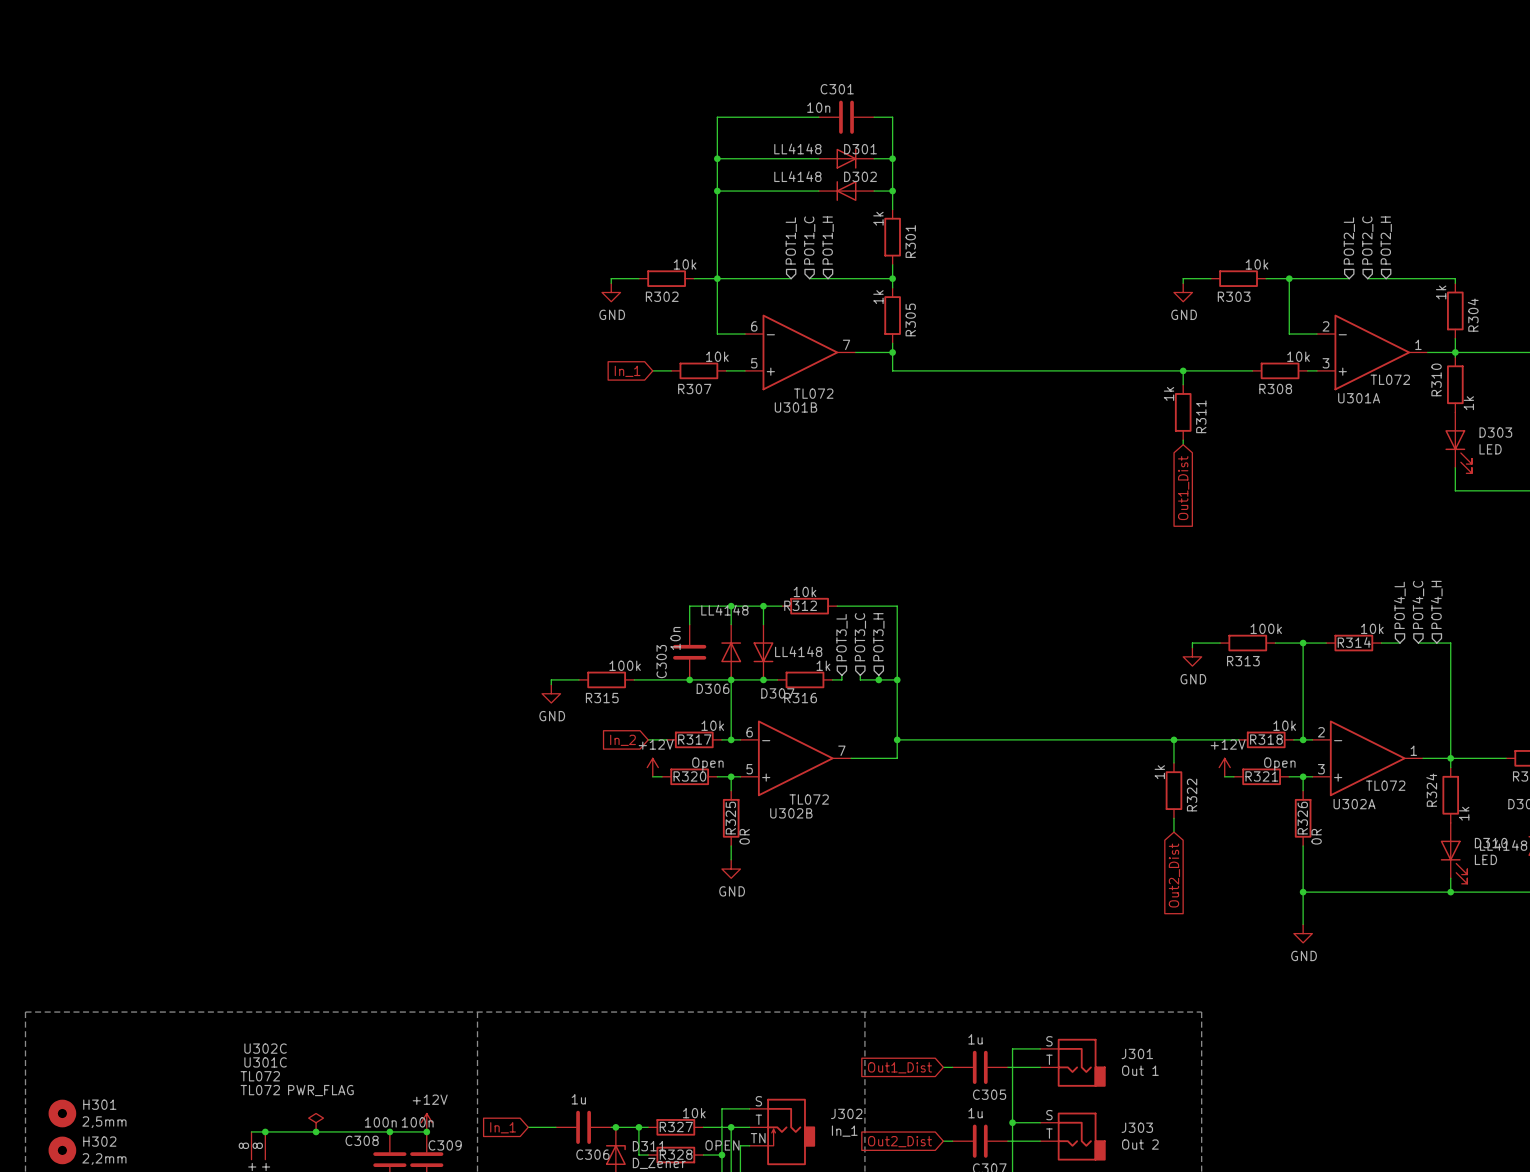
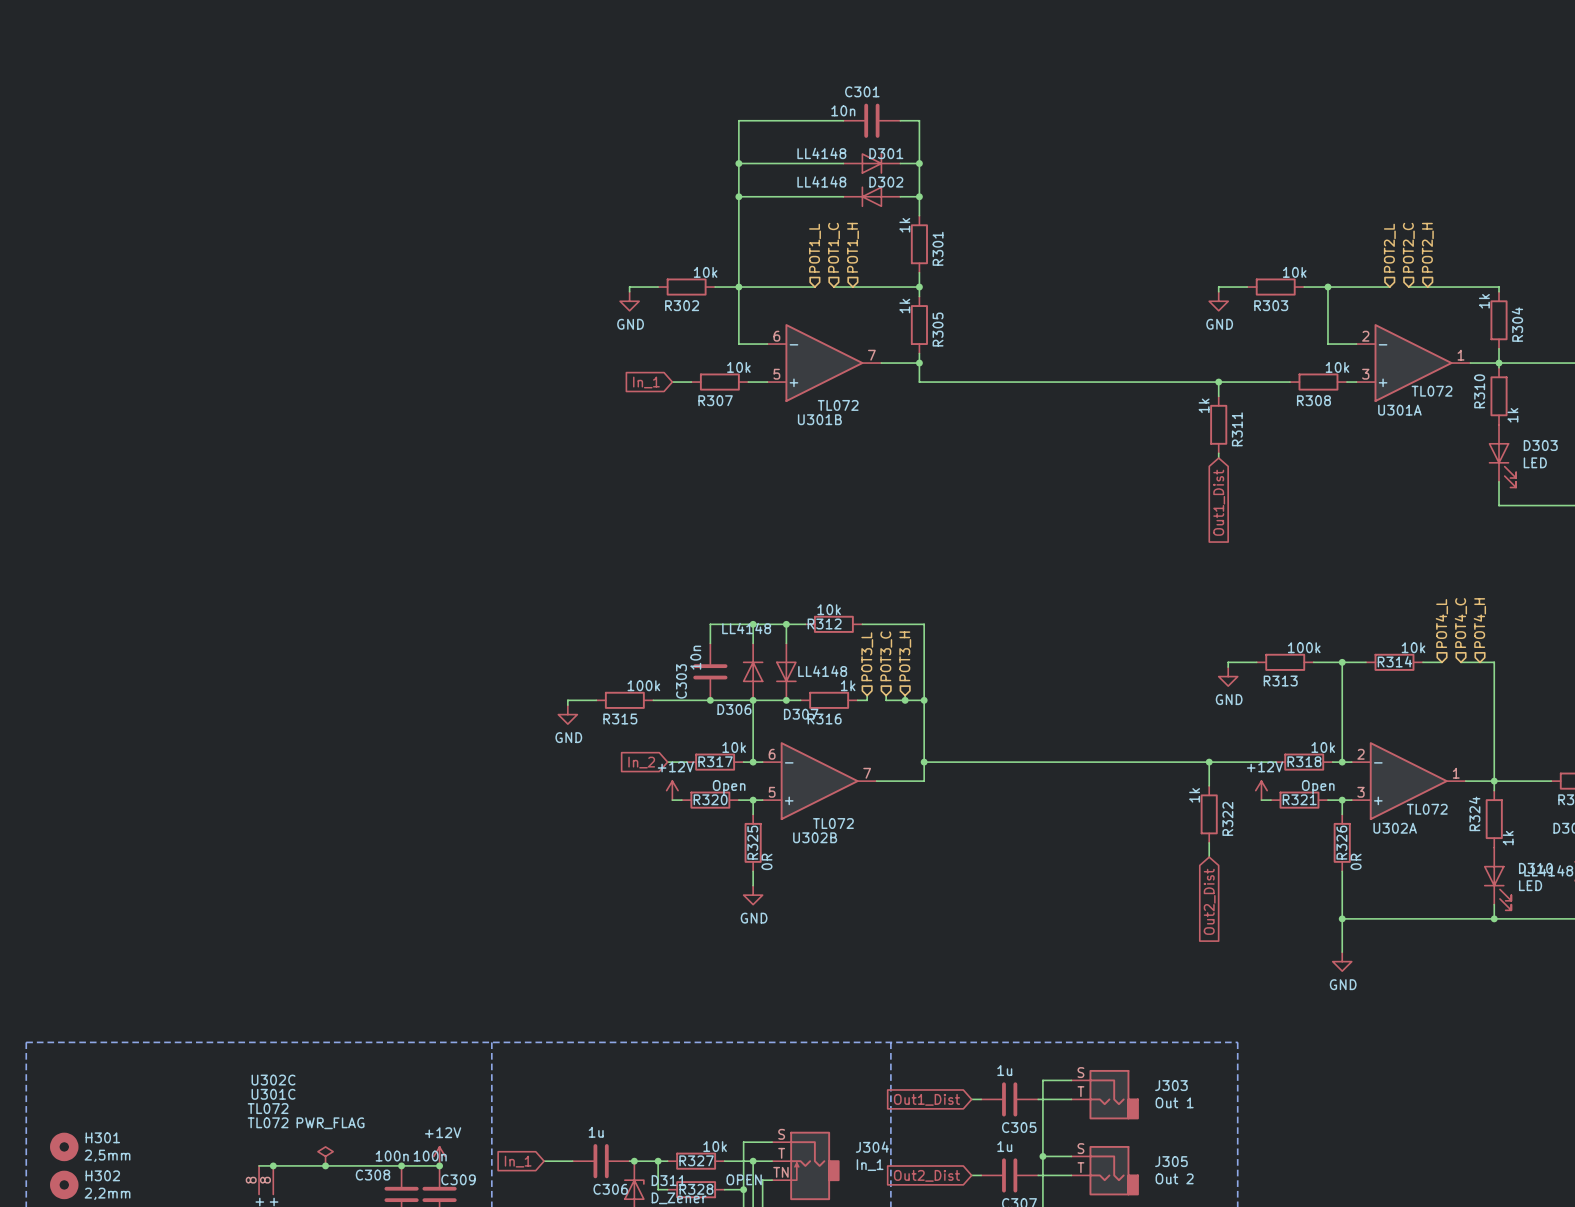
J301 name: J301 (1137, 1053) -> J303 (1171, 1085)
J302 name: J302 (846, 1113) -> J304 (872, 1147)
J303 name: J303 (1137, 1127) -> J305 (1171, 1161)

